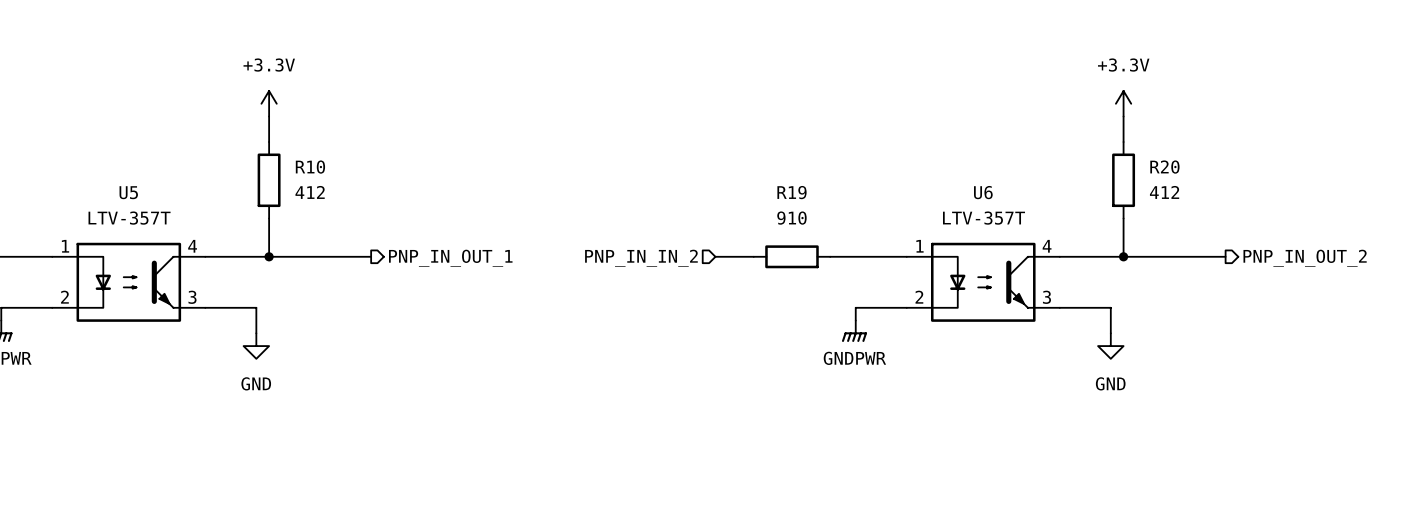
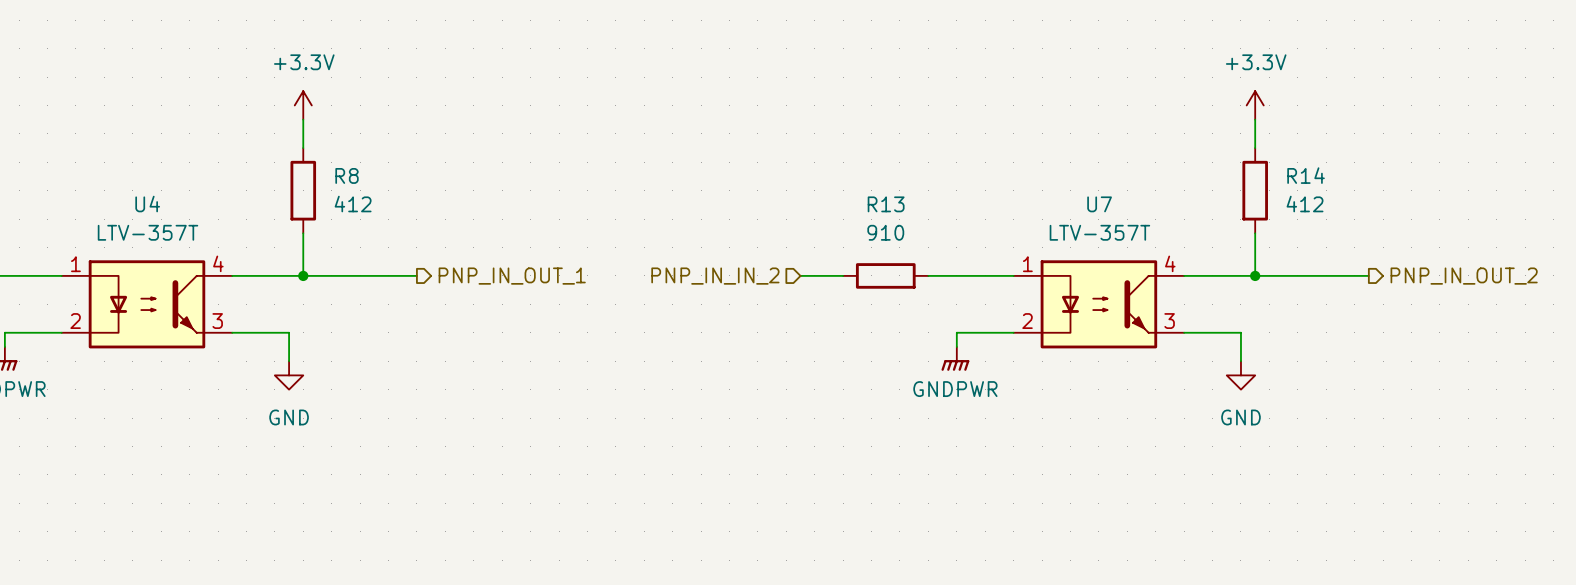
R10 name: R10 (310, 167) -> R8 (347, 175)
R20 name: R20 (1164, 167) -> R14 (1306, 175)
U5 name: U5 (128, 192) -> U4 (147, 204)
R19 name: R19 (792, 192) -> R13 (886, 204)
U6 name: U6 (983, 192) -> U7 (1099, 204)

